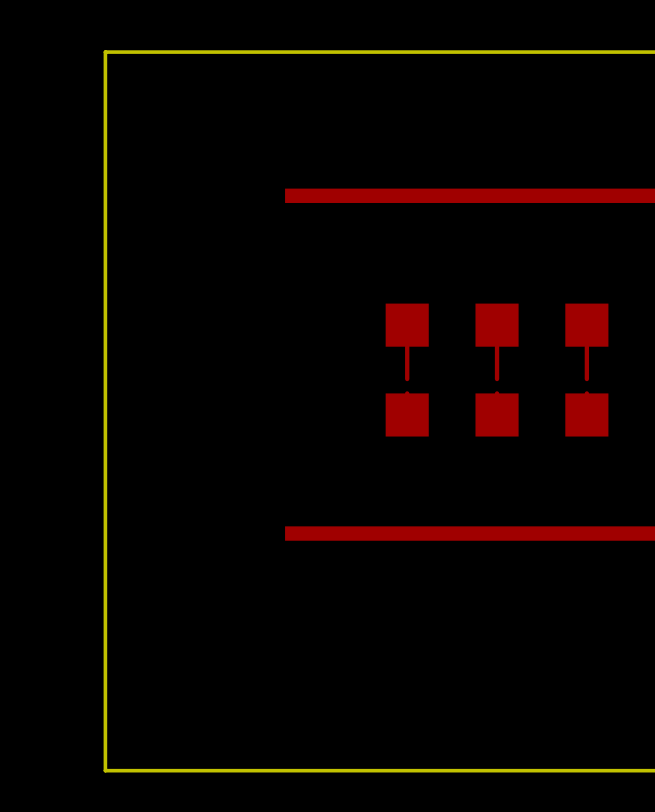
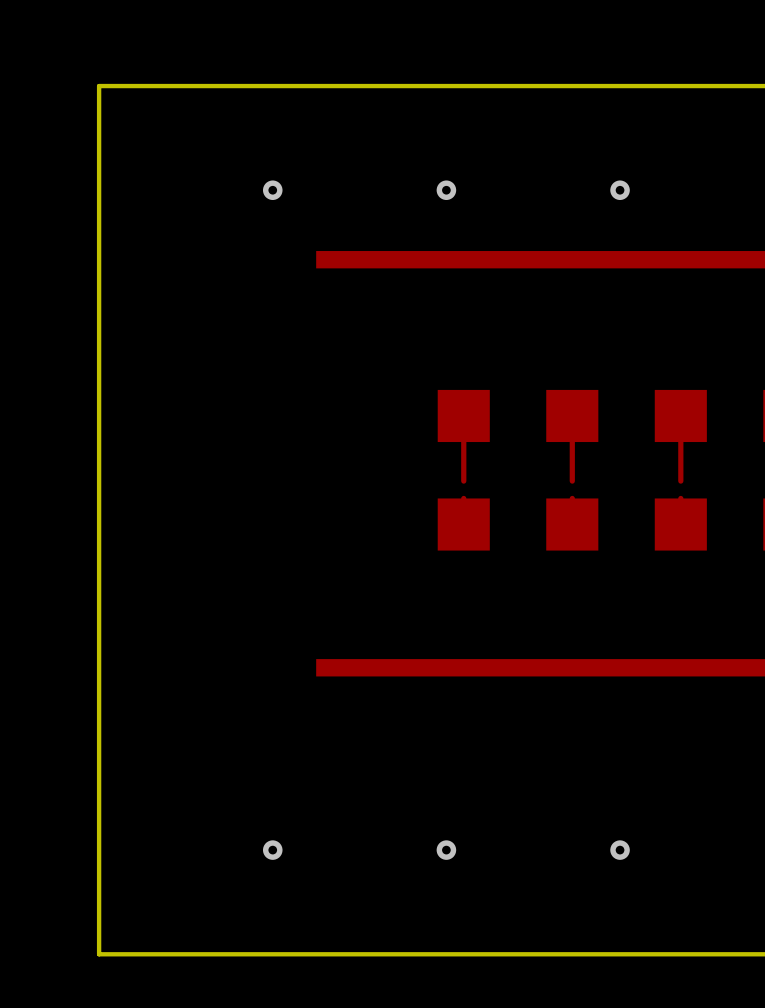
via: none -> (272, 190)
via: none -> (446, 190)
via: none -> (620, 190)
via: none -> (272, 850)
via: none -> (446, 850)
via: none -> (620, 850)

